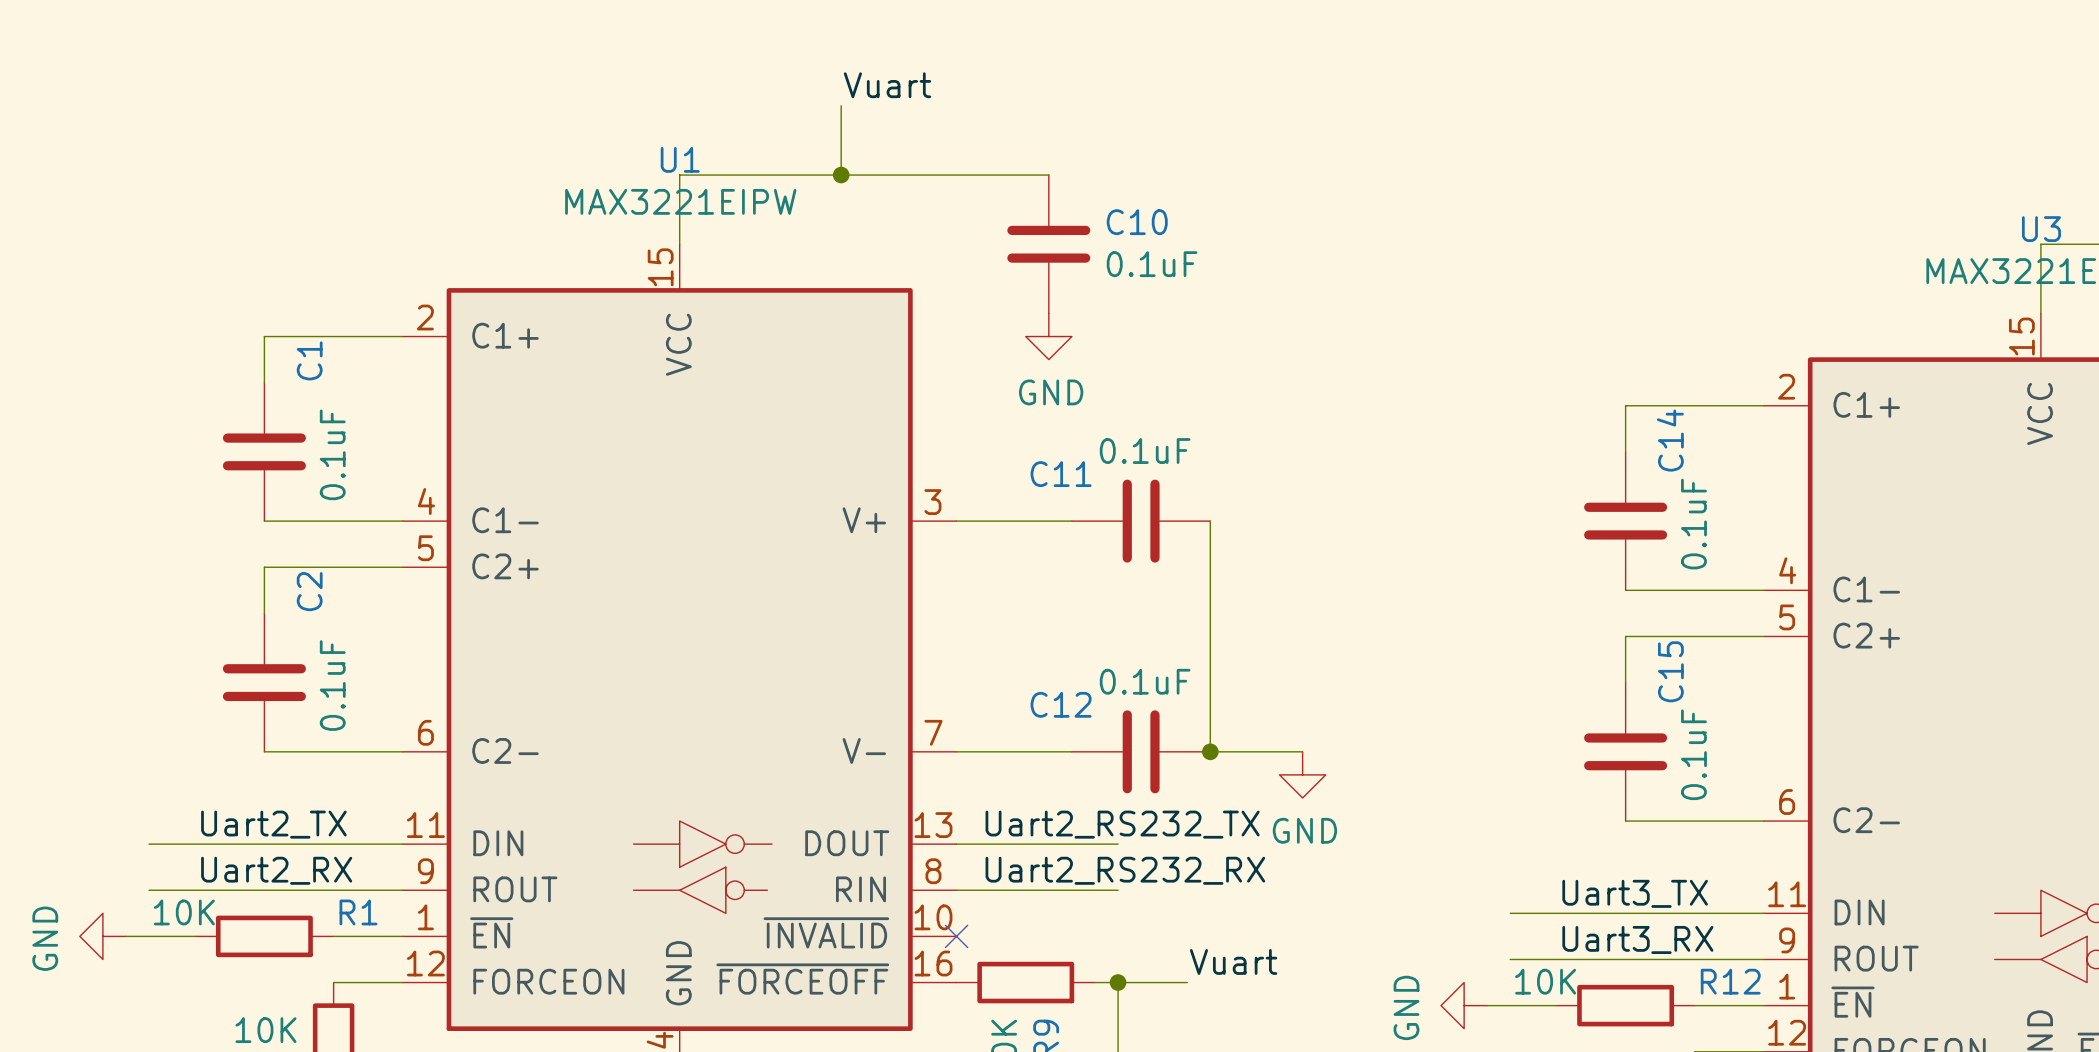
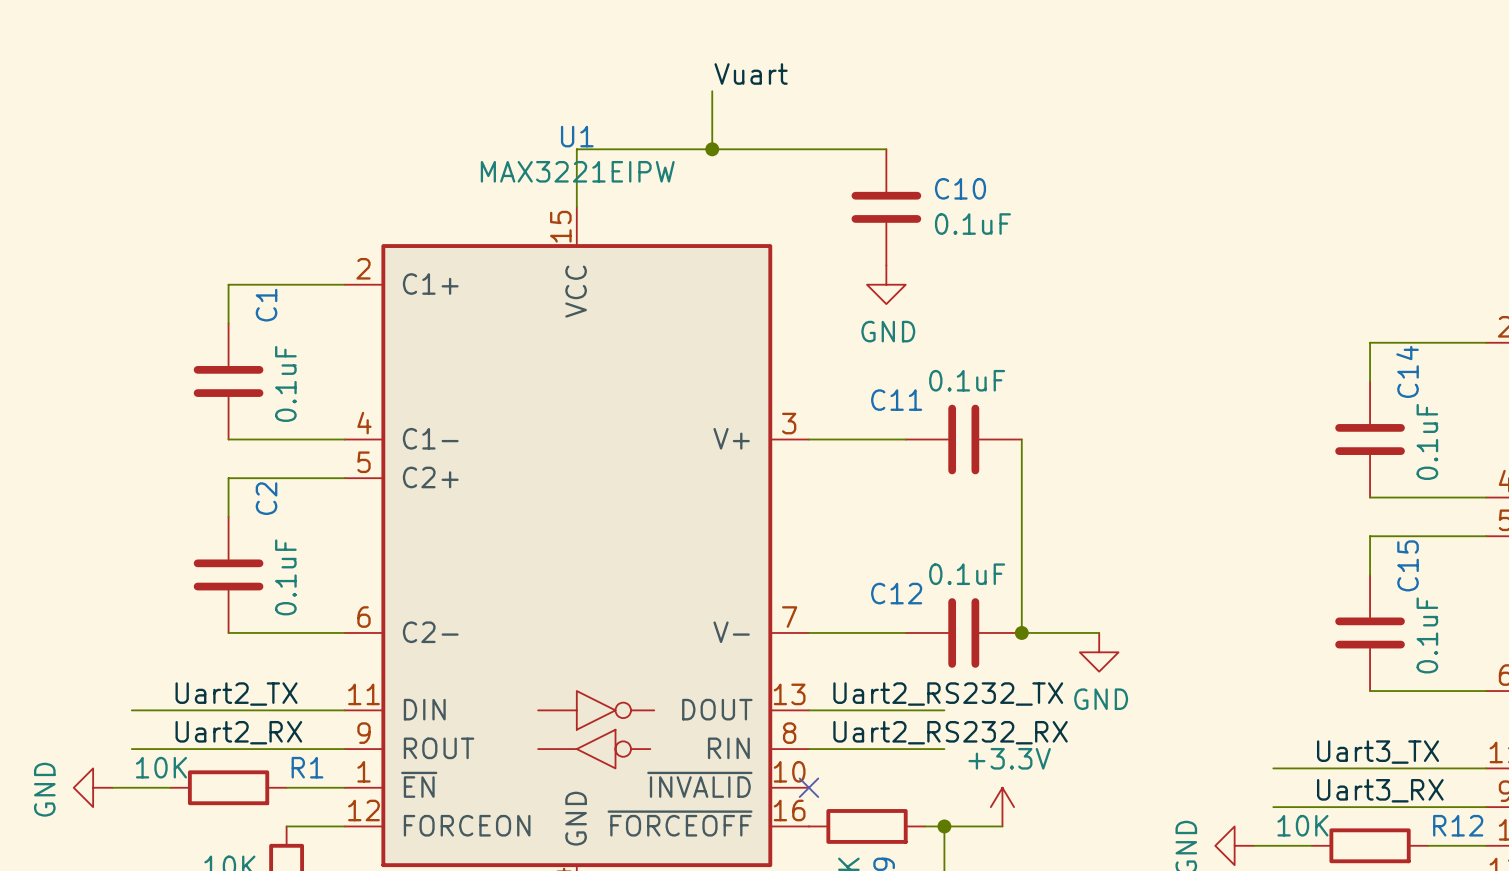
power symbol: none -> +3.3V (1002, 807)
label: Vuart (1233, 961) -> none

